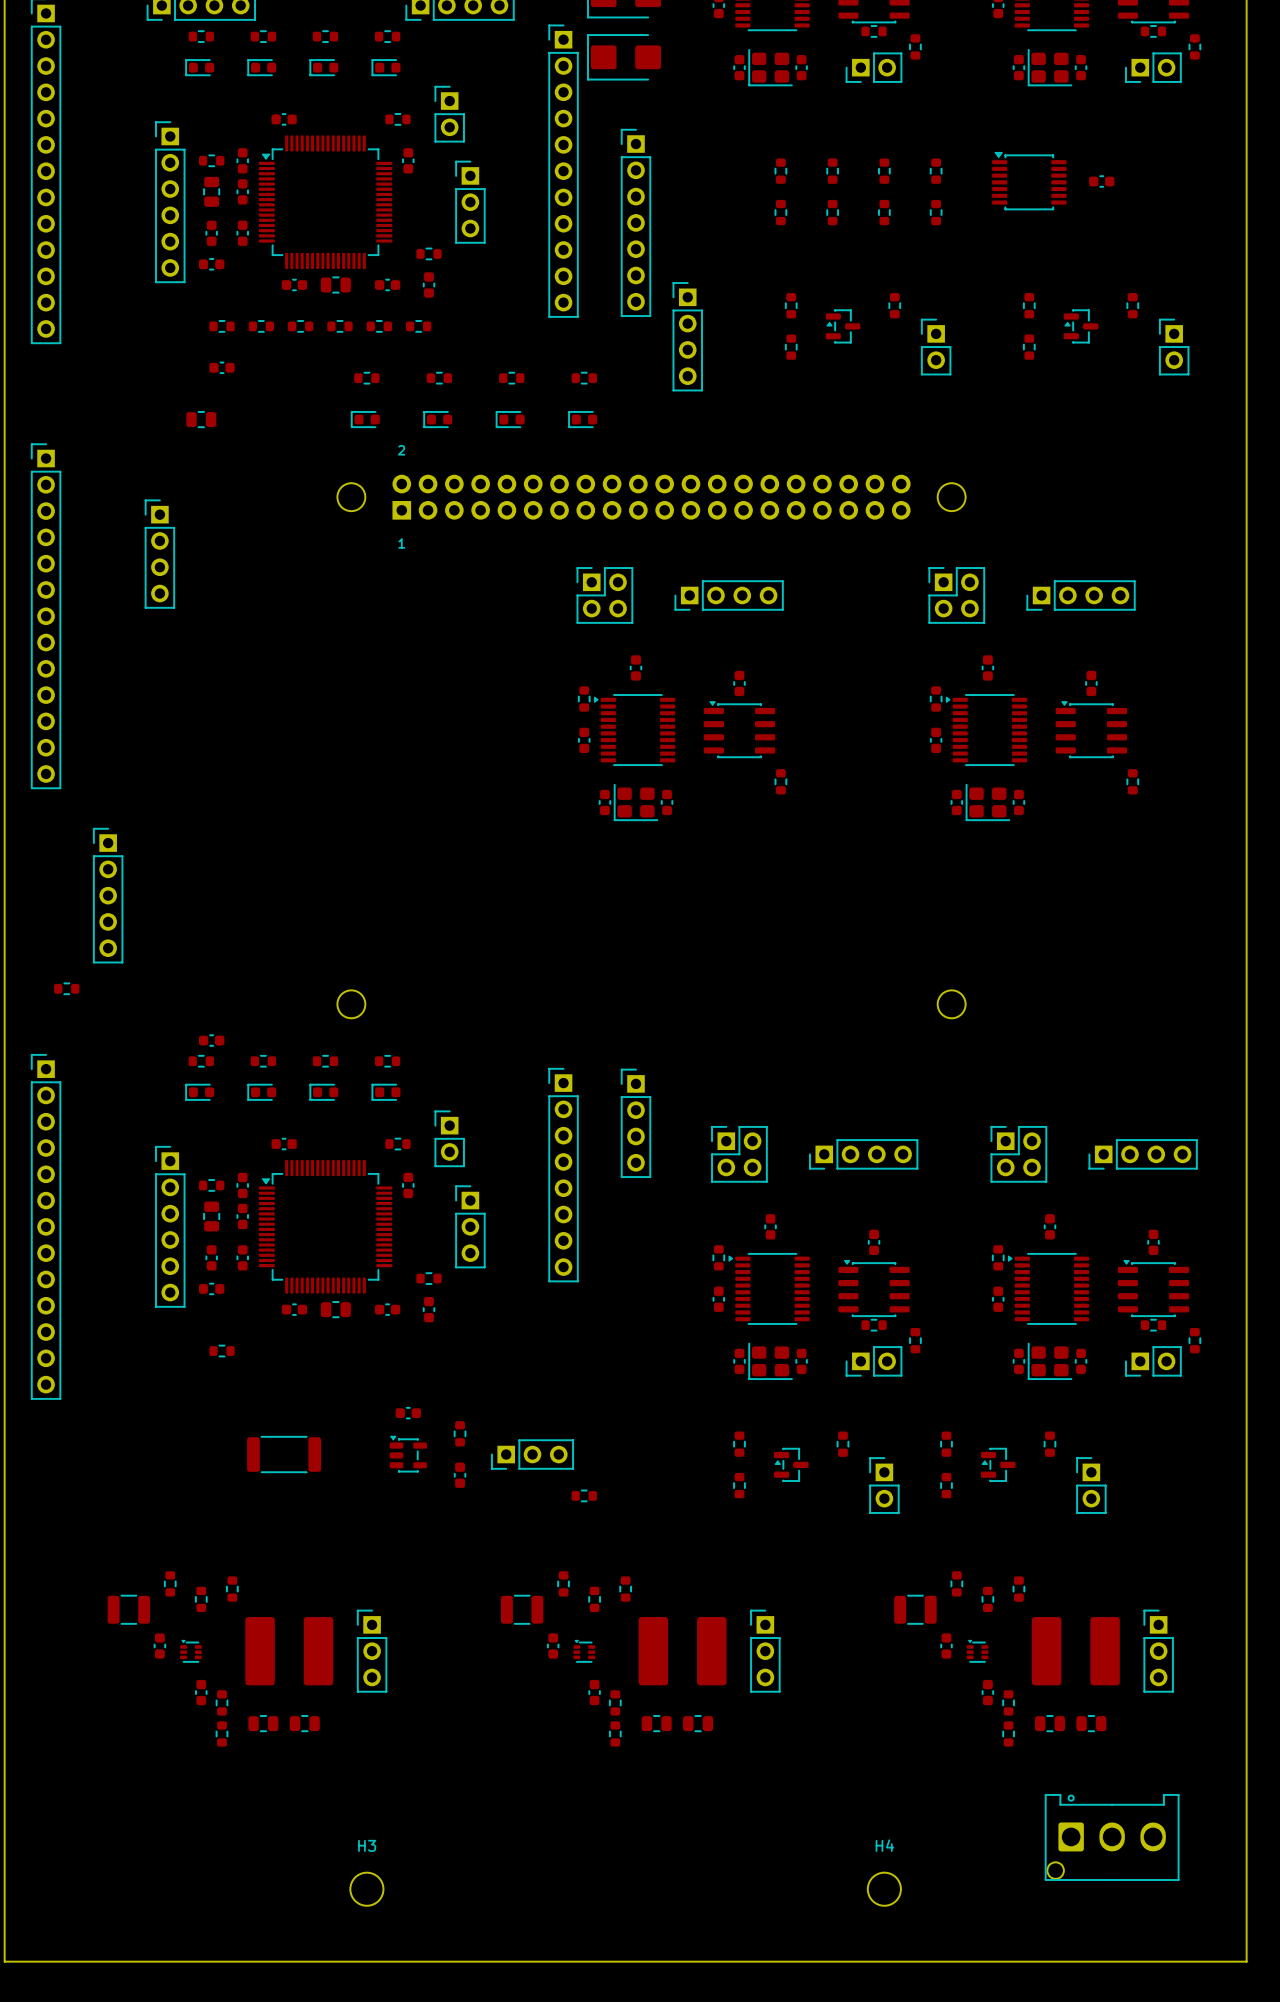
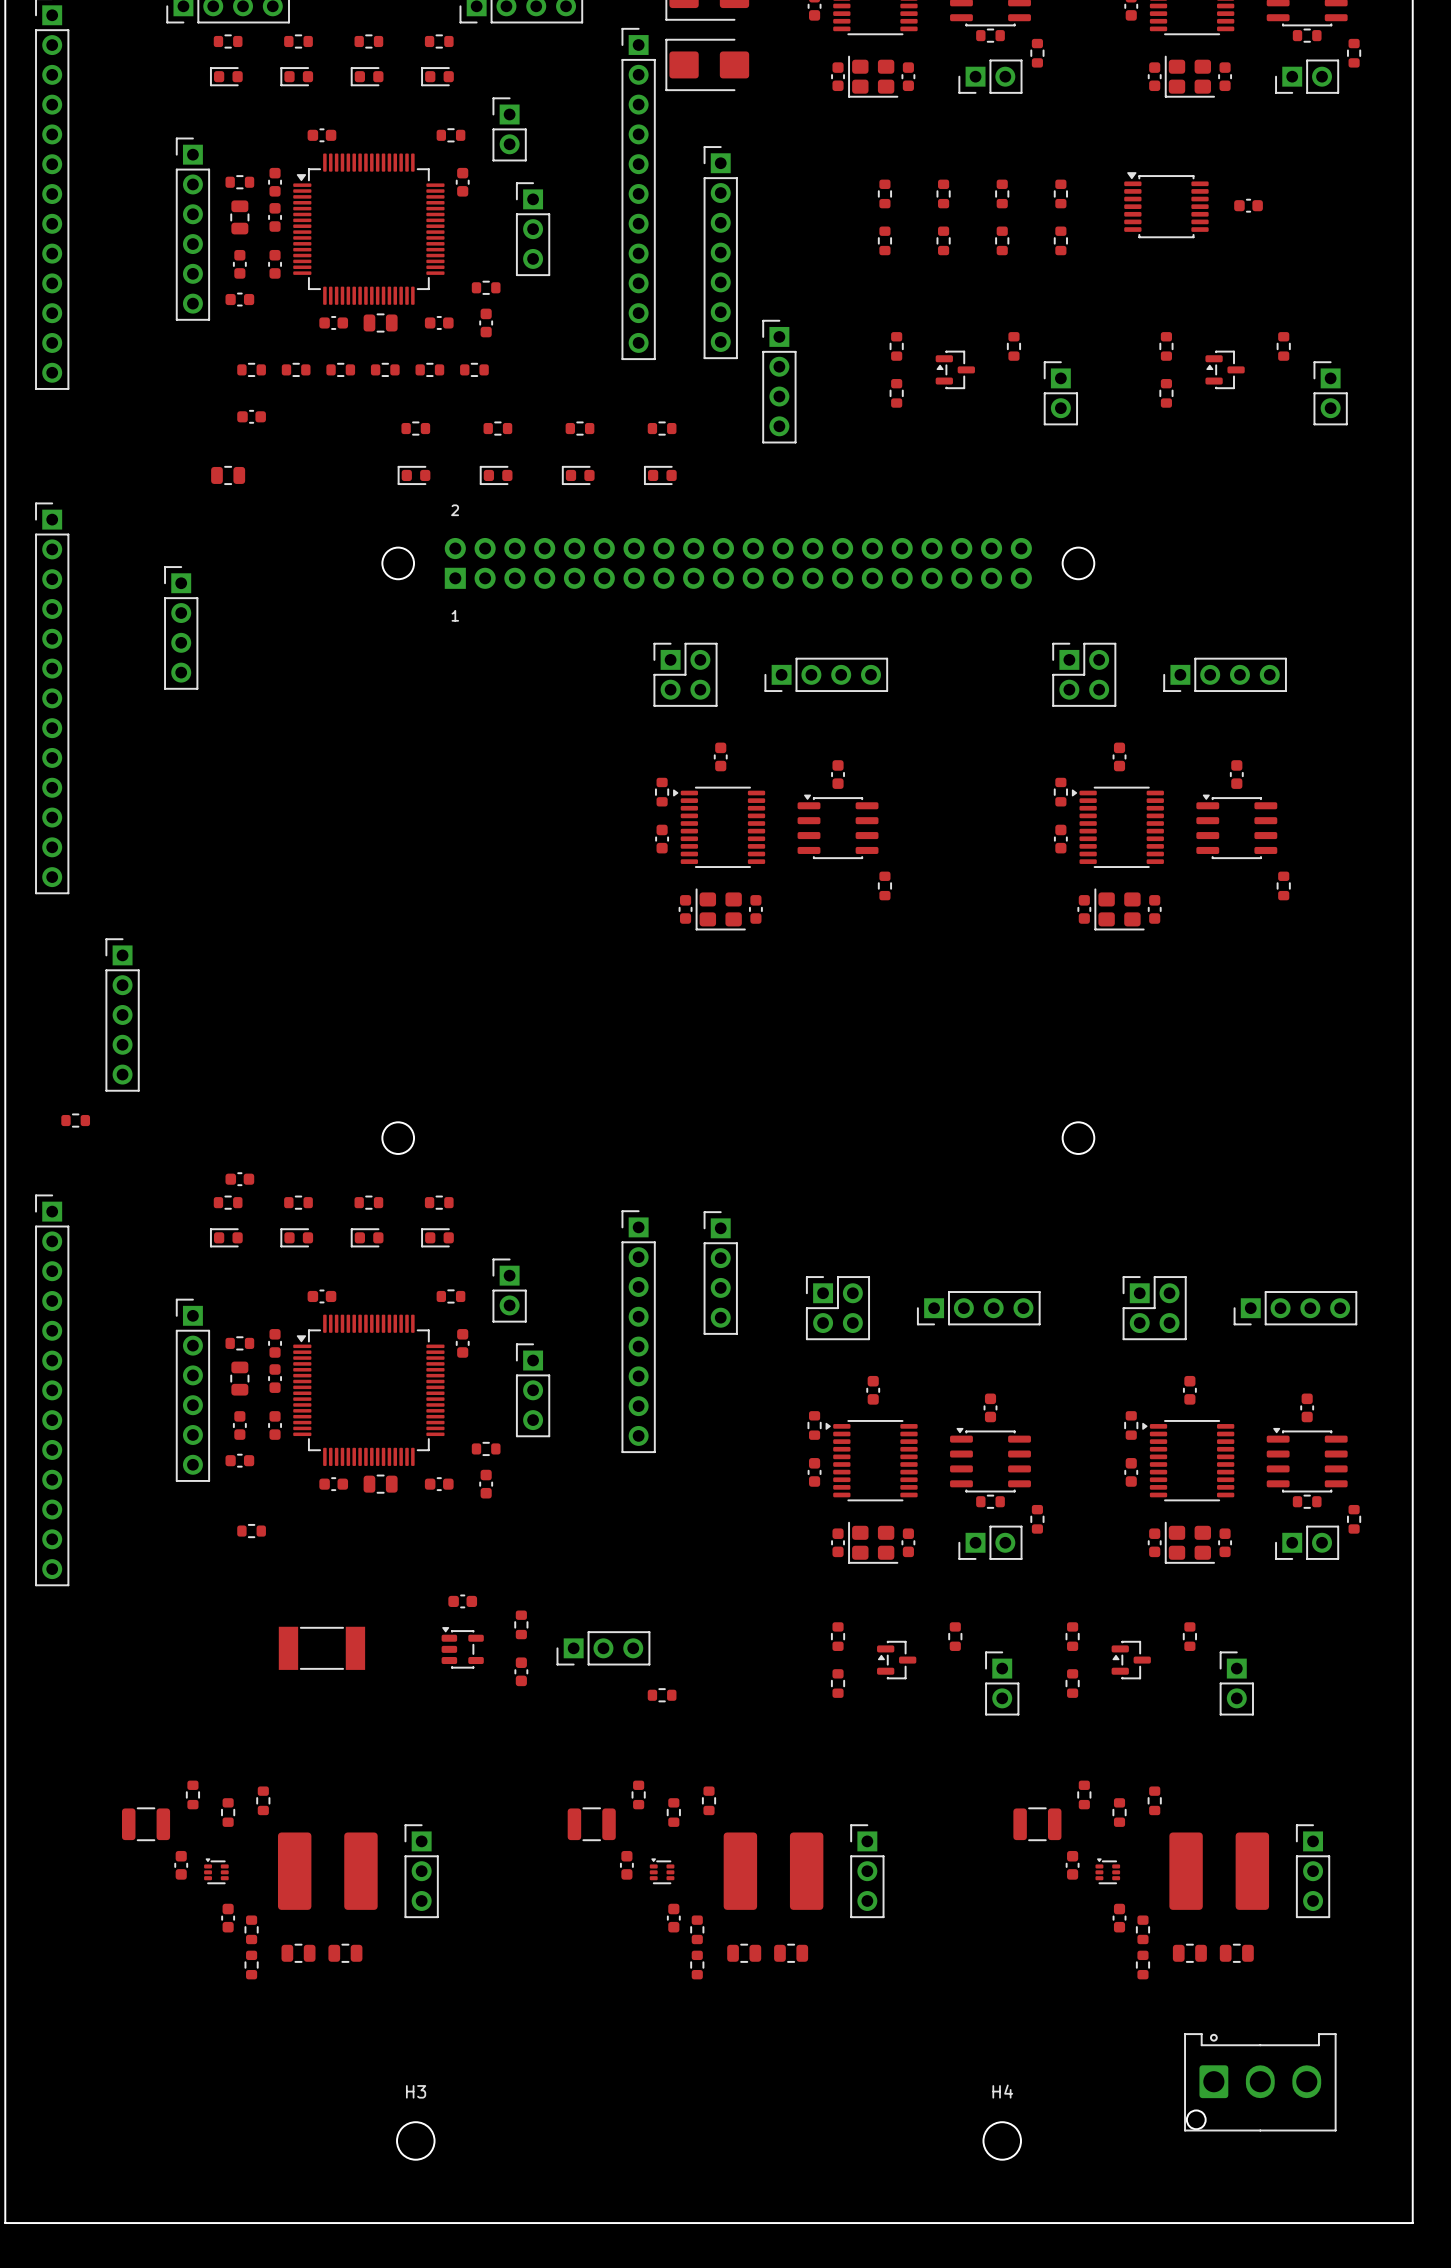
part footprint: [247, 1436, 322, 1473] -> [278, 1626, 366, 1670]

